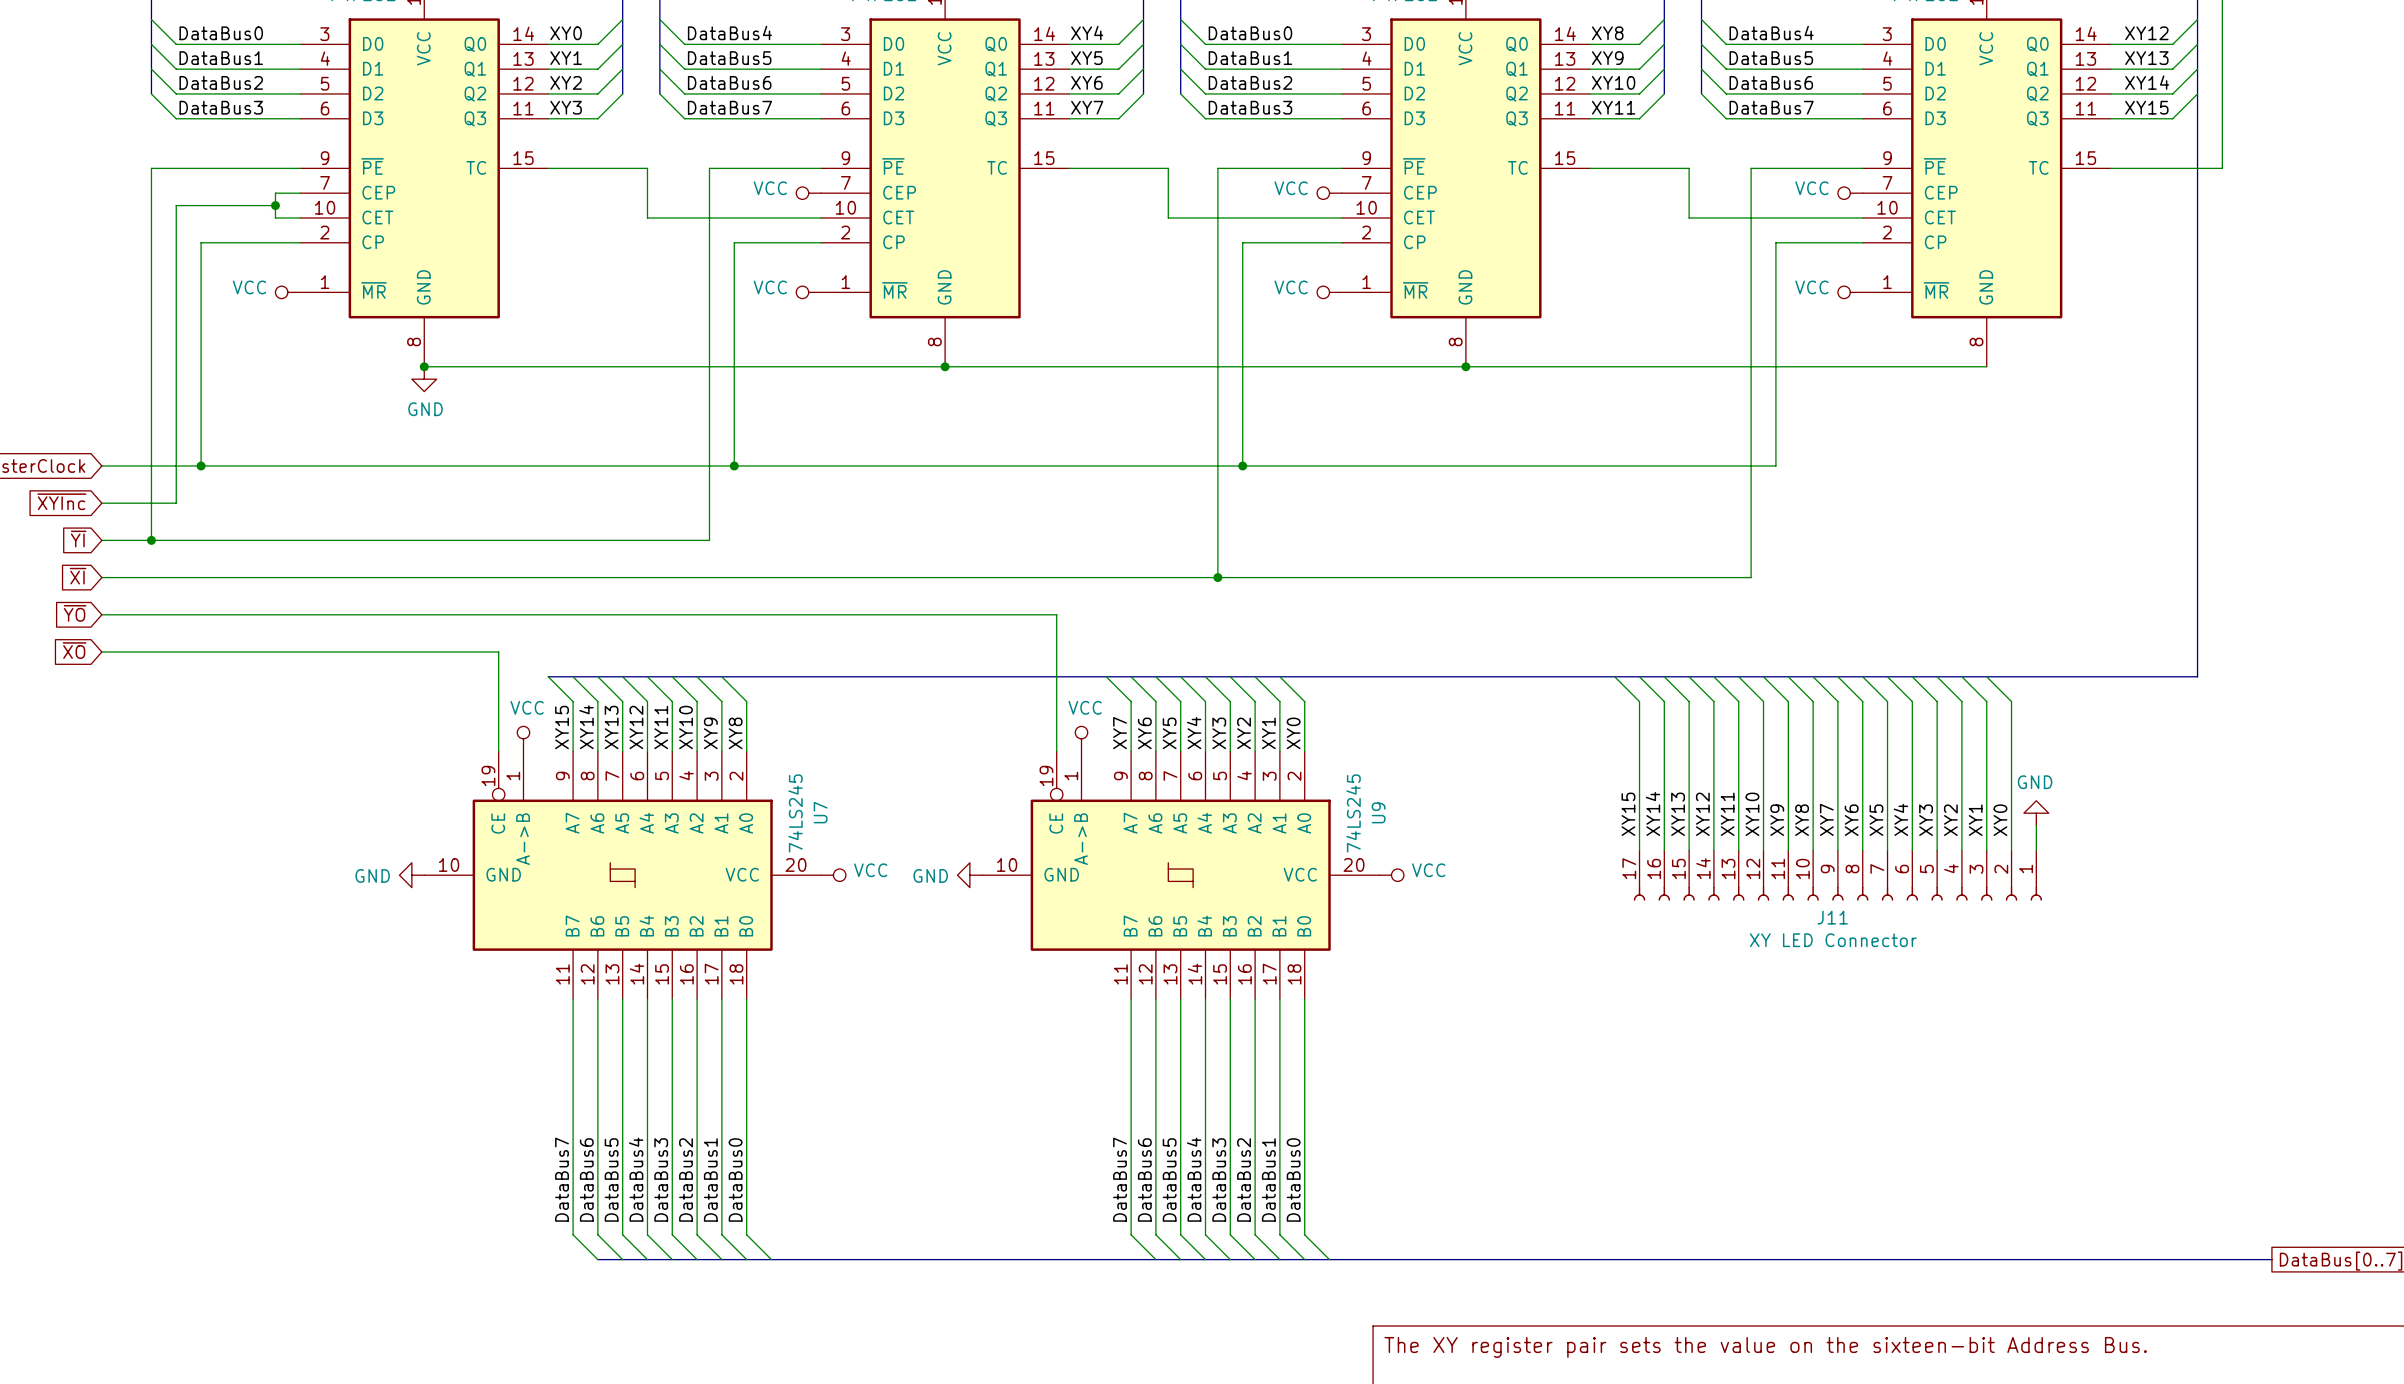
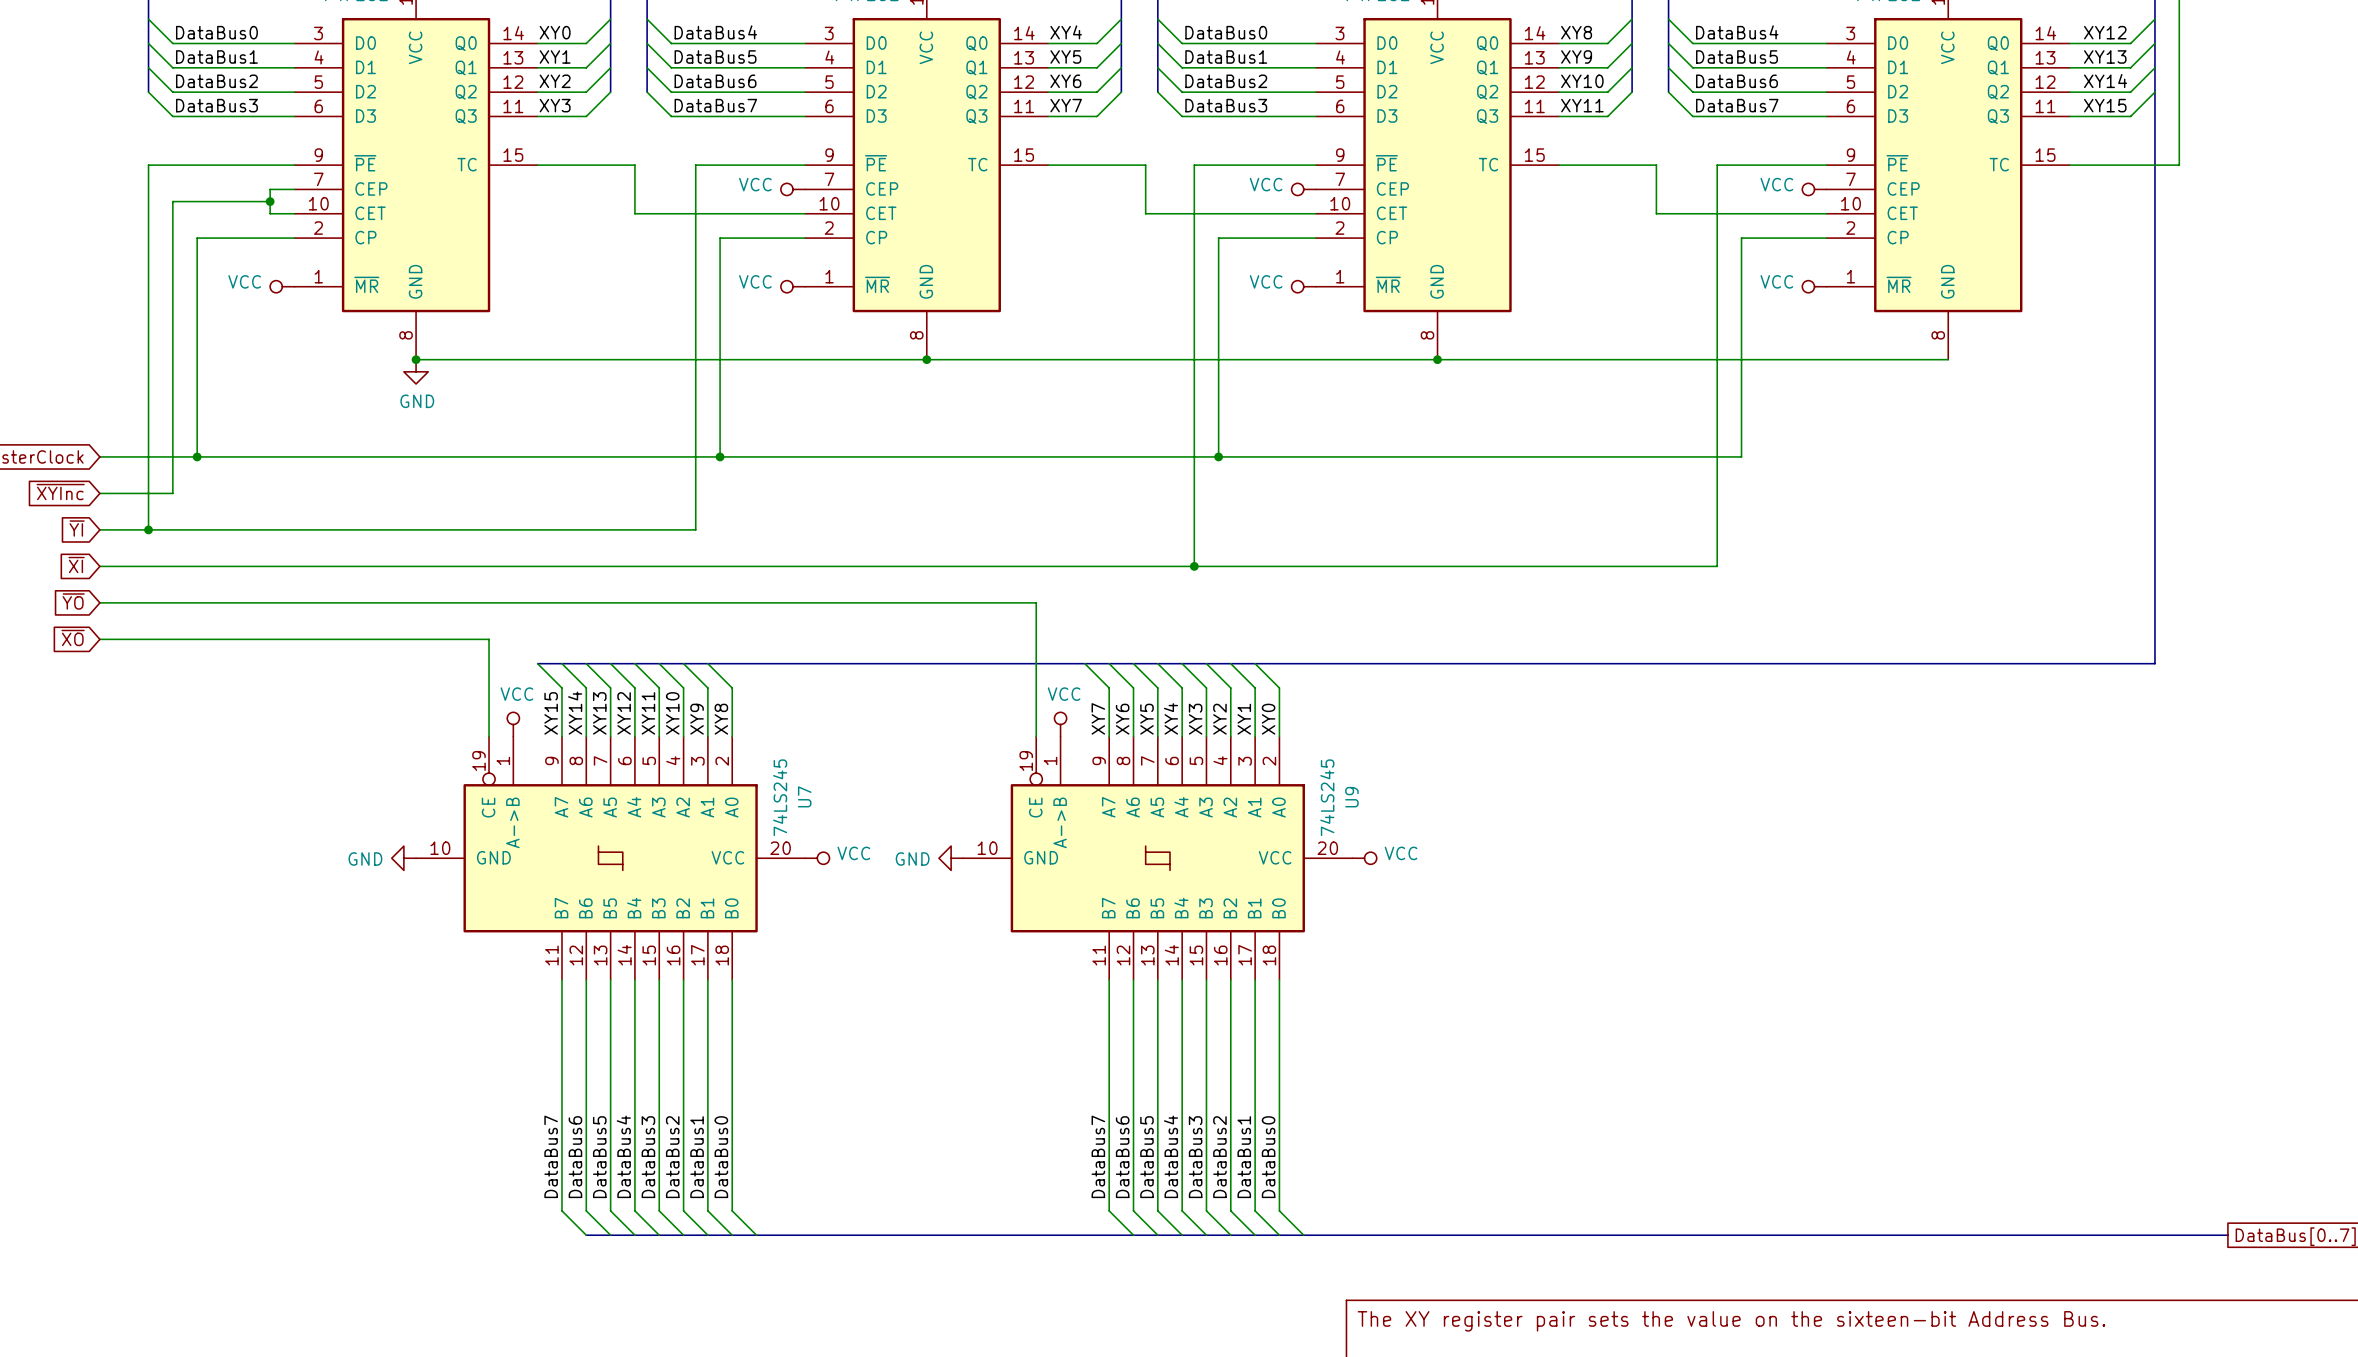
wire: (1614, 676) (1639, 701) (1639, 850) -> none
wire: (1639, 676) (1664, 701) (1664, 850) -> none
wire: (1664, 676) (1689, 701) (1689, 850) -> none
wire: (1689, 676) (1713, 701) (1713, 850) -> none
wire: (1713, 676) (1738, 701) (1738, 850) -> none
wire: (1738, 676) (1763, 701) (1763, 850) -> none
wire: (1763, 676) (1788, 701) (1788, 850) -> none
wire: (1788, 676) (1813, 701) (1813, 850) -> none
wire: (1813, 676) (1837, 701) (1837, 850) -> none
wire: (1837, 676) (1862, 701) (1862, 850) -> none
wire: (1862, 676) (1887, 701) (1887, 850) -> none
wire: (1887, 676) (1912, 701) (1912, 850) -> none
wire: (1912, 676) (1937, 701) (1937, 850) -> none
wire: (1937, 676) (1961, 701) (1961, 850) -> none
wire: (1961, 676) (1986, 701) (1986, 850) -> none
wire: (1986, 676) (2011, 701) (2011, 850) -> none
label: XY14 (1652, 813) -> none
power symbol: GND (2036, 813) -> none
label: XY15 (1628, 814) -> none
label: XY13 (1678, 814) -> none
label: XY12 (1702, 814) -> none
label: XY11 (1727, 814) -> none
label: XY10 (1752, 814) -> none
label: XY7 (1826, 819) -> none
label: XY4 (1900, 819) -> none
label: XY9 (1777, 820) -> none
label: XY8 (1802, 820) -> none
label: XY6 (1851, 820) -> none
label: XY5 (1876, 820) -> none
label: XY3 (1926, 820) -> none
label: XY2 (1950, 820) -> none
label: XY1 (1975, 820) -> none
label: XY0 (2000, 820) -> none
wire: (2036, 825) (2036, 850) -> none
J11: XY LED Connector (1837, 875) -> none

